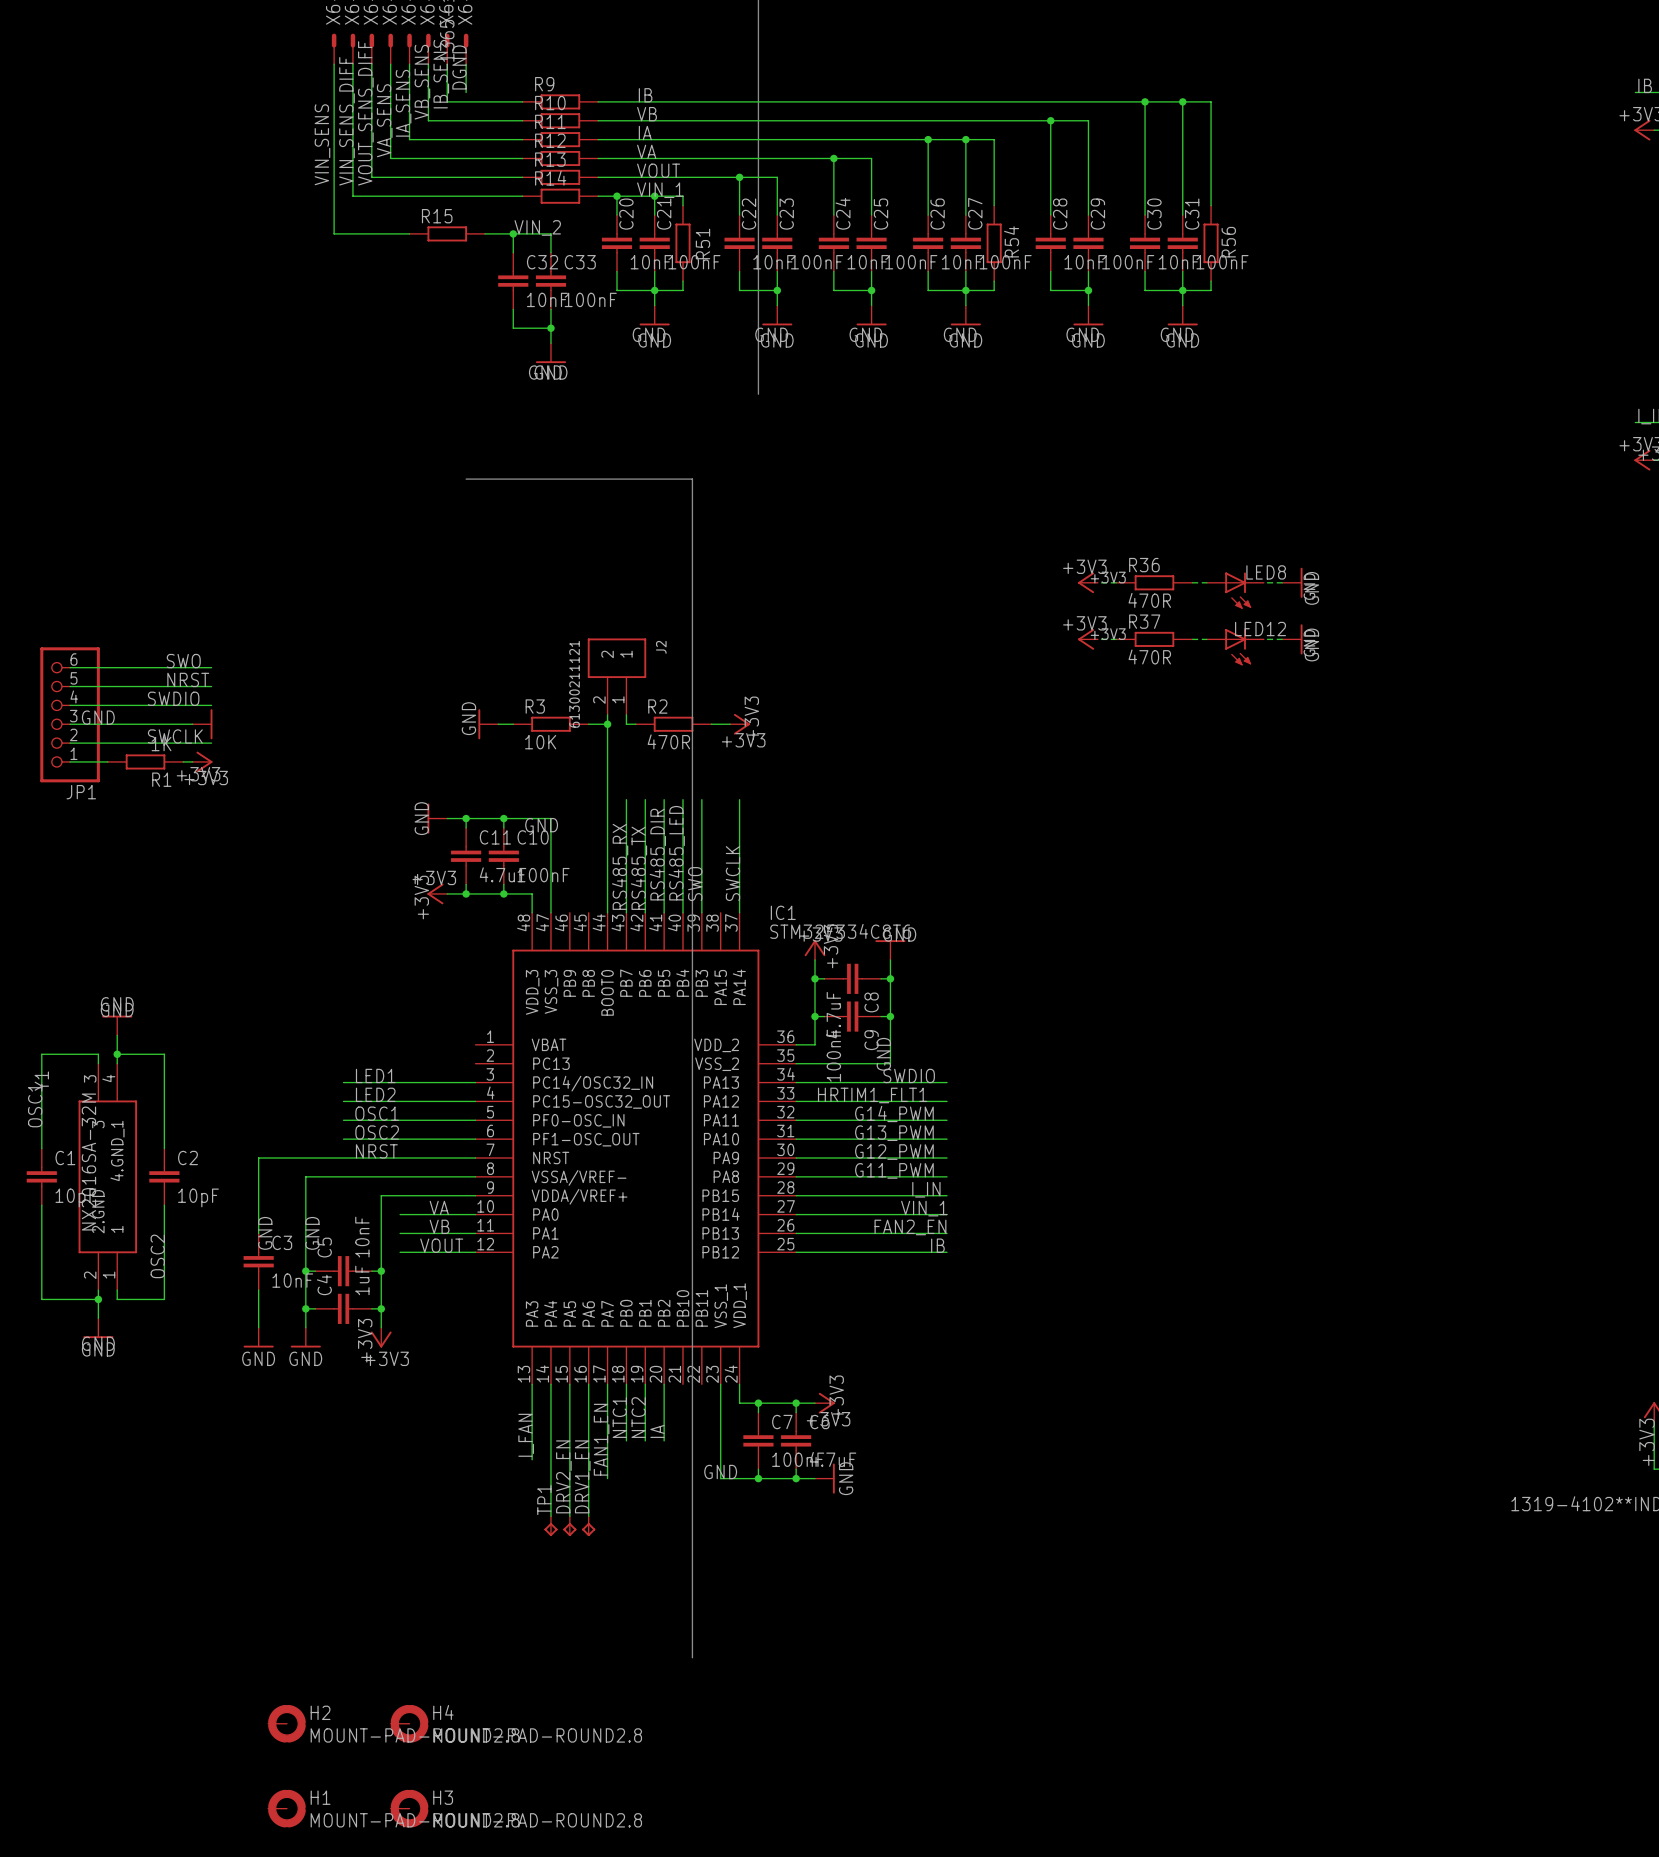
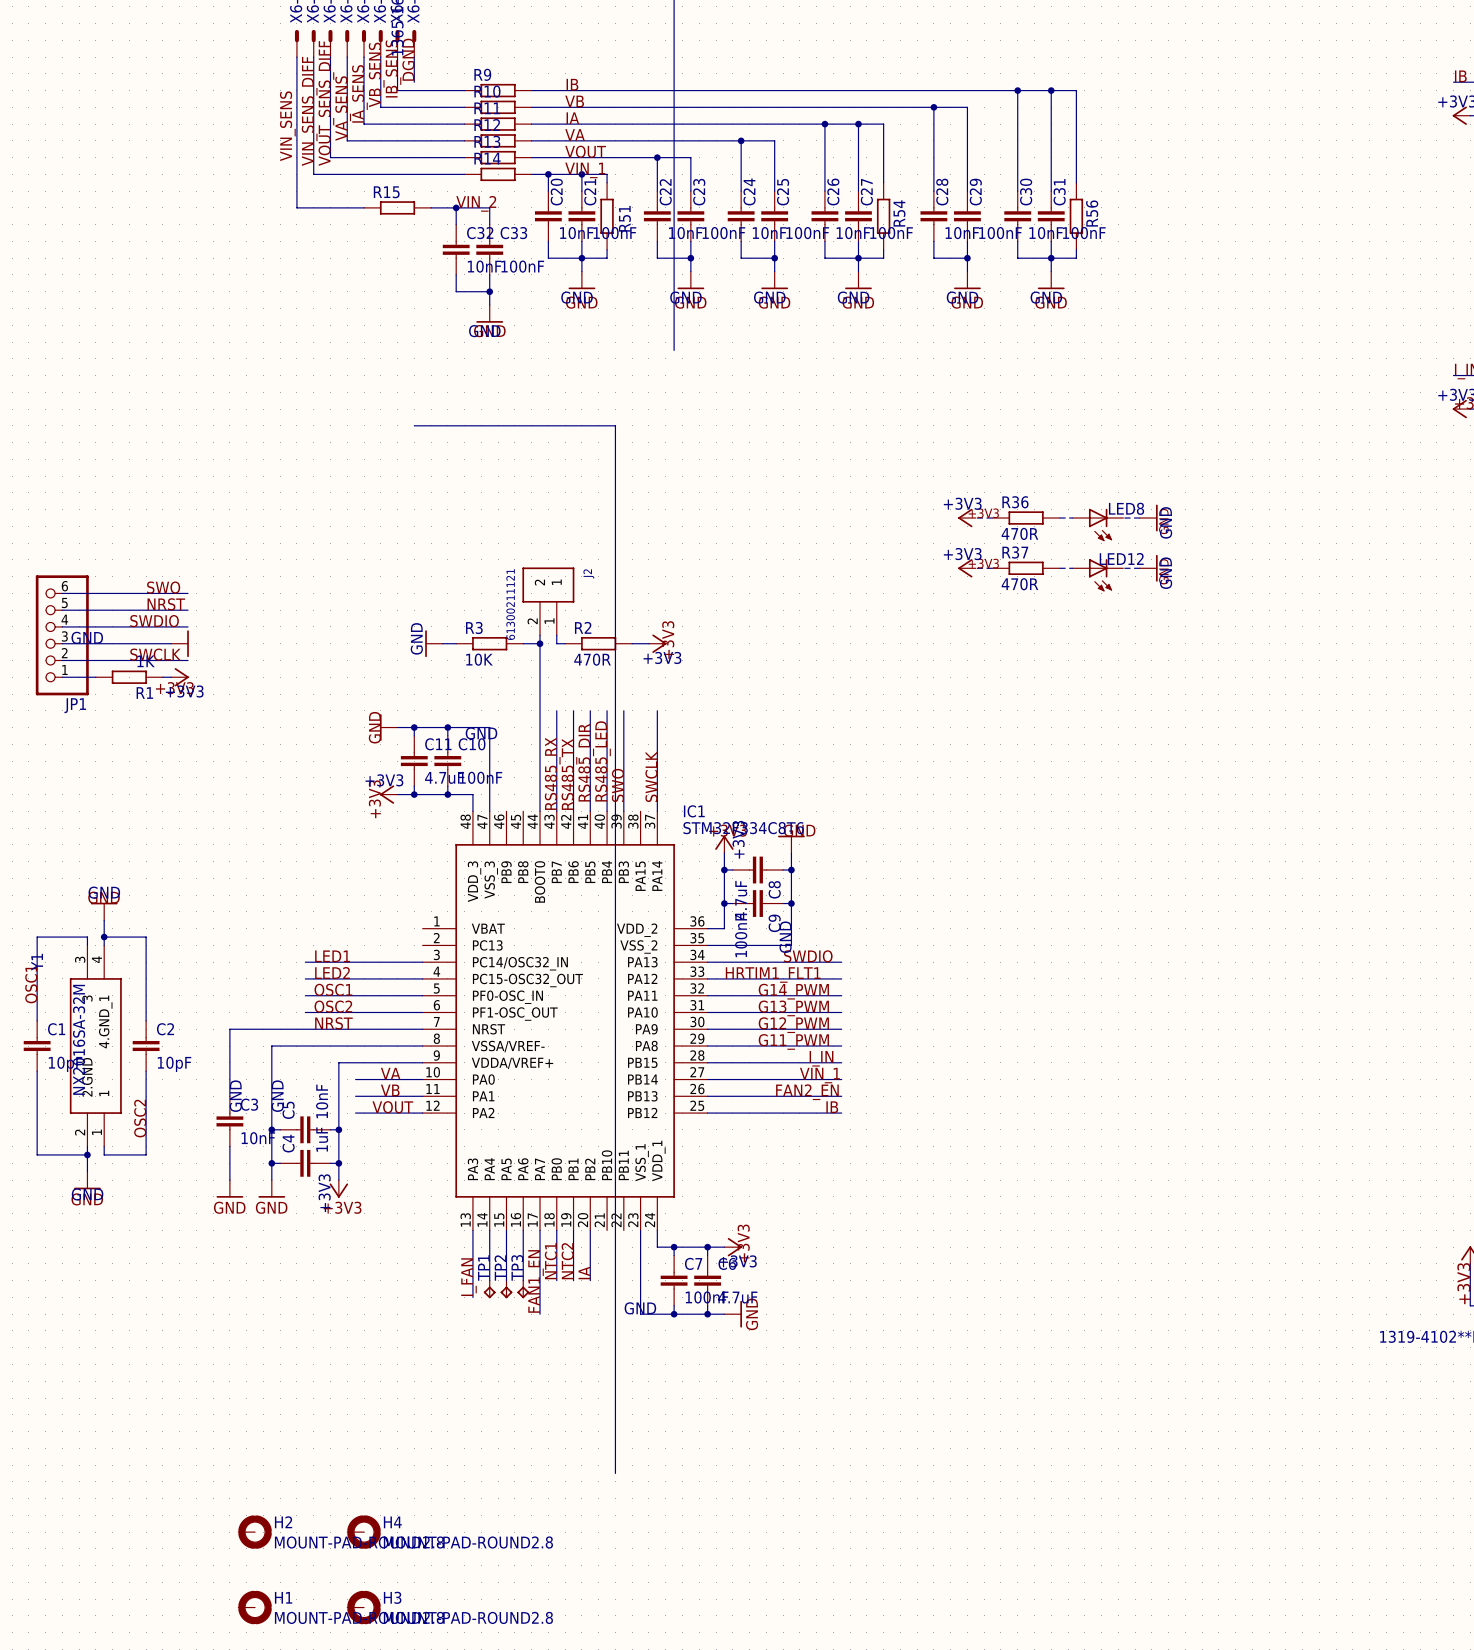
wire: (550, 1440) (550, 1516) -> none
wire: (569, 1440) (569, 1516) -> none
wire: (588, 1440) (588, 1516) -> none
TP2: none -> (506, 1289)
TP3: none -> (523, 1289)
label: DRV2_EN (563, 1476) -> none
label: DRV1_EN (582, 1476) -> none
TP1 position: (550, 1526) -> (489, 1289)
part: (569, 1526) -> none
part: (588, 1526) -> none

